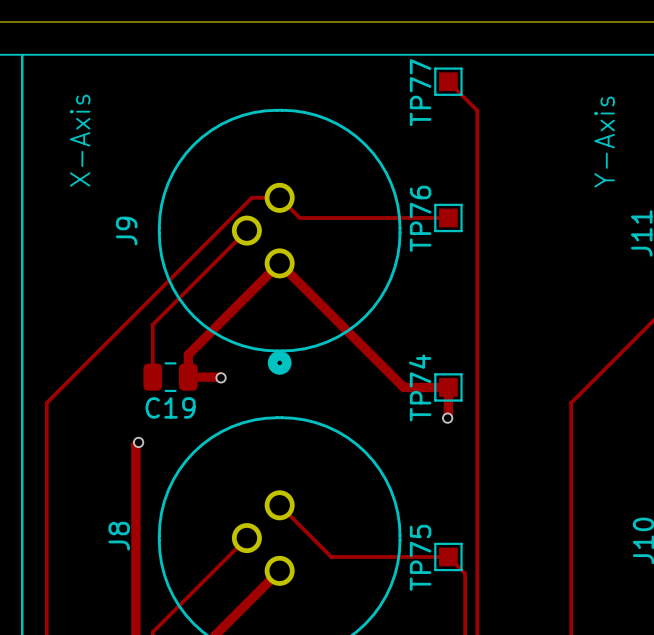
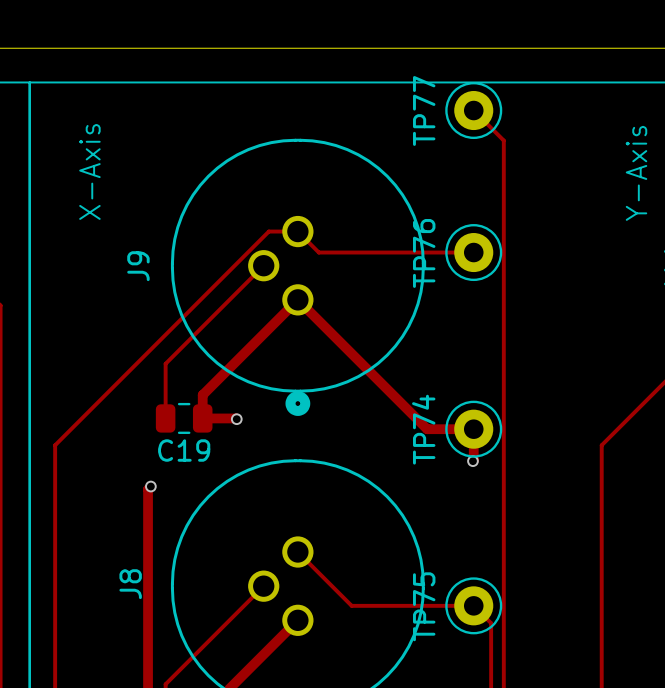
TP77 footprint: [434, 67, 463, 96] -> [445, 82, 503, 140]
TP76 footprint: [434, 203, 463, 233] -> [445, 224, 503, 282]
TP74 footprint: [434, 373, 463, 402] -> [445, 400, 503, 458]
TP75 footprint: [434, 542, 463, 572] -> [445, 577, 503, 635]

